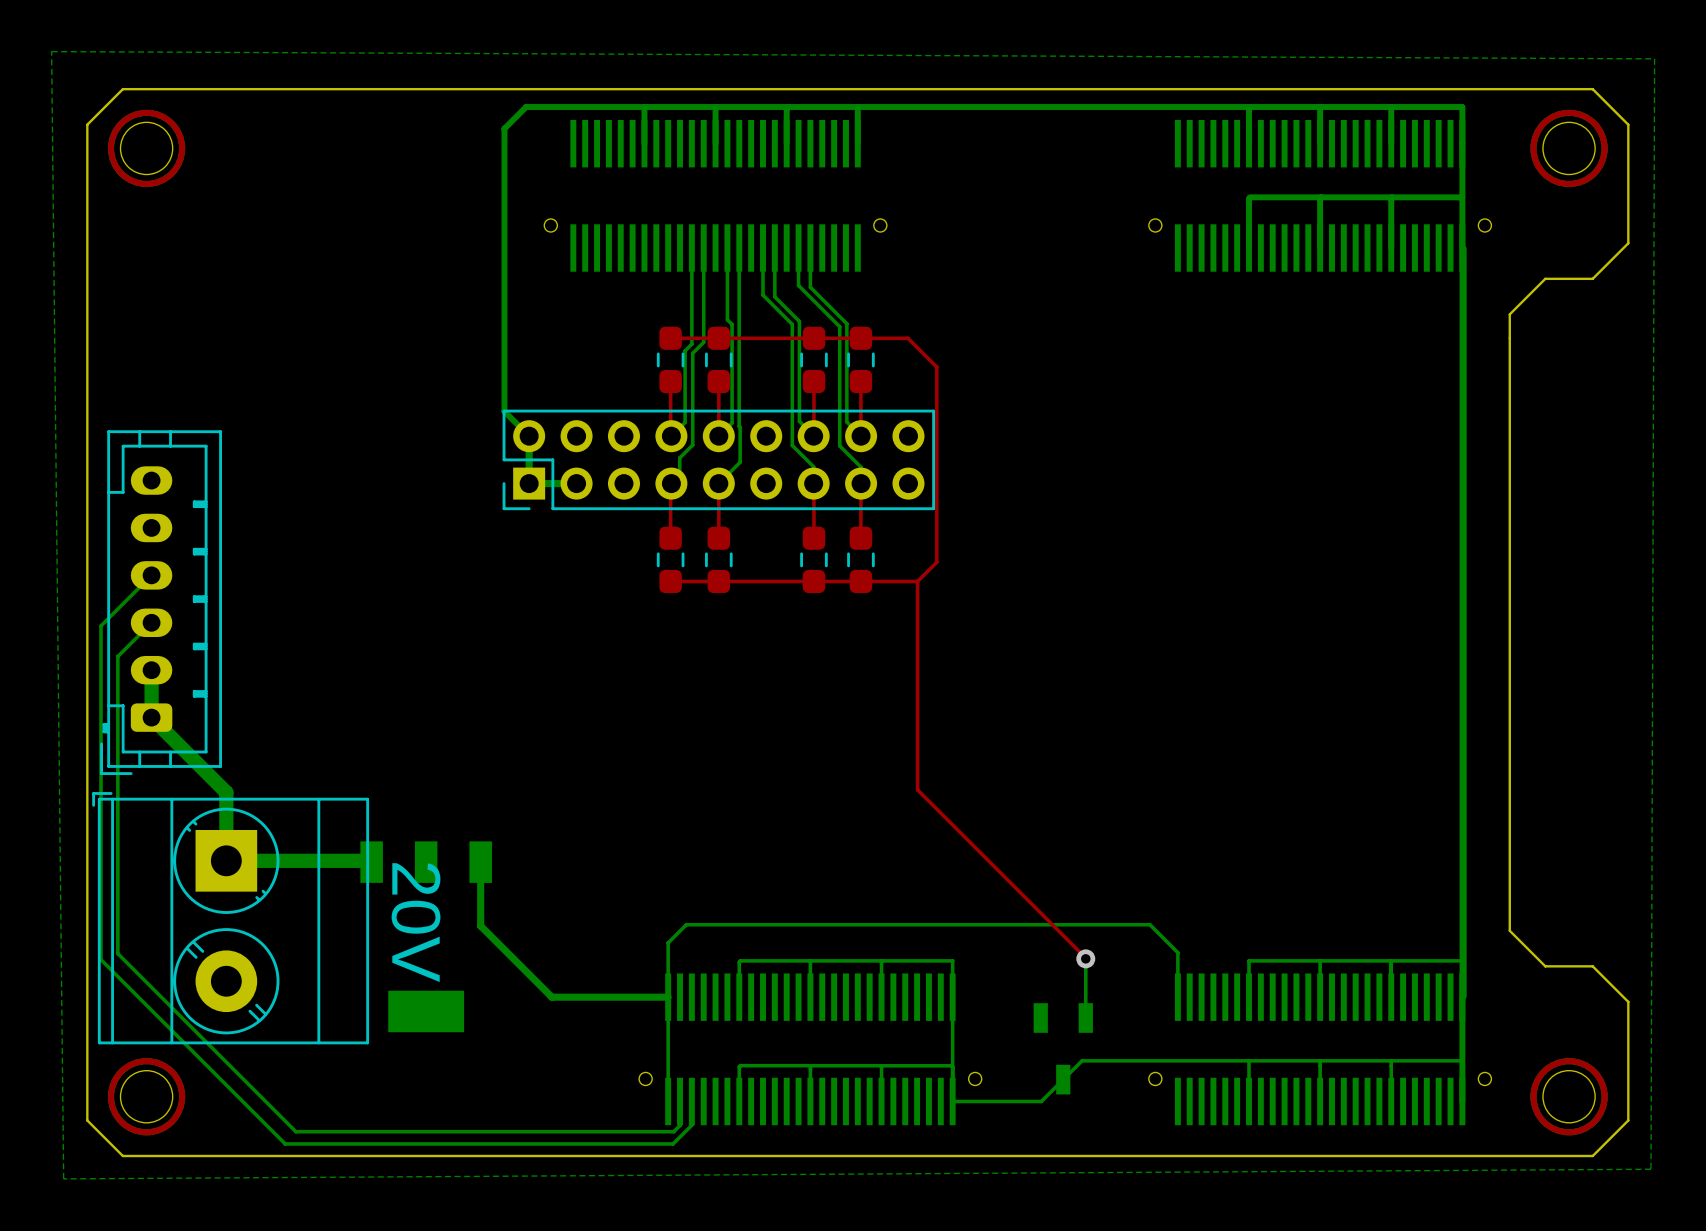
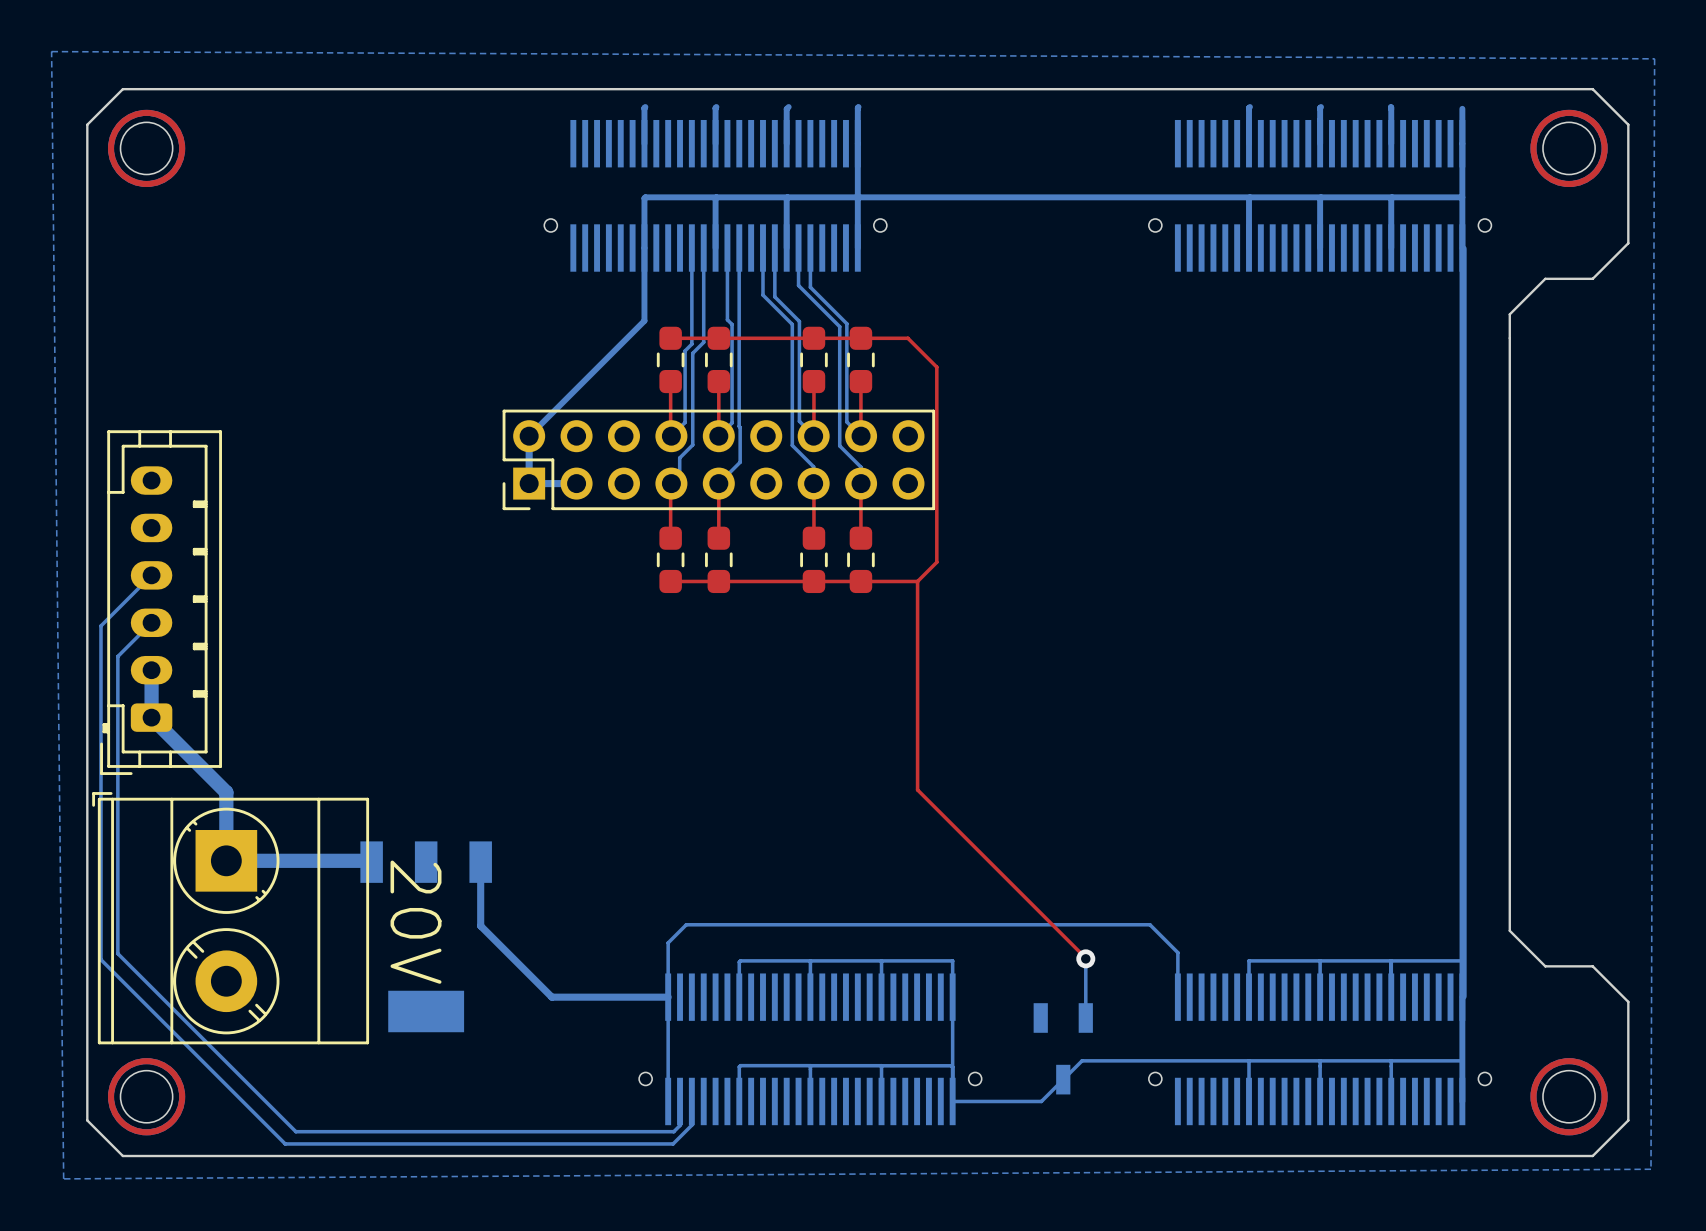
bottom track: (1462, 108) (1461, 107) (526, 107) (504, 128) (504, 411) (529, 436) -> (1249, 197) (645, 197) (644, 320) (529, 436)
bottom track: none -> (857, 143) (857, 248)
bottom track: none -> (715, 198) (715, 248)
bottom track: none -> (786, 198) (786, 248)

